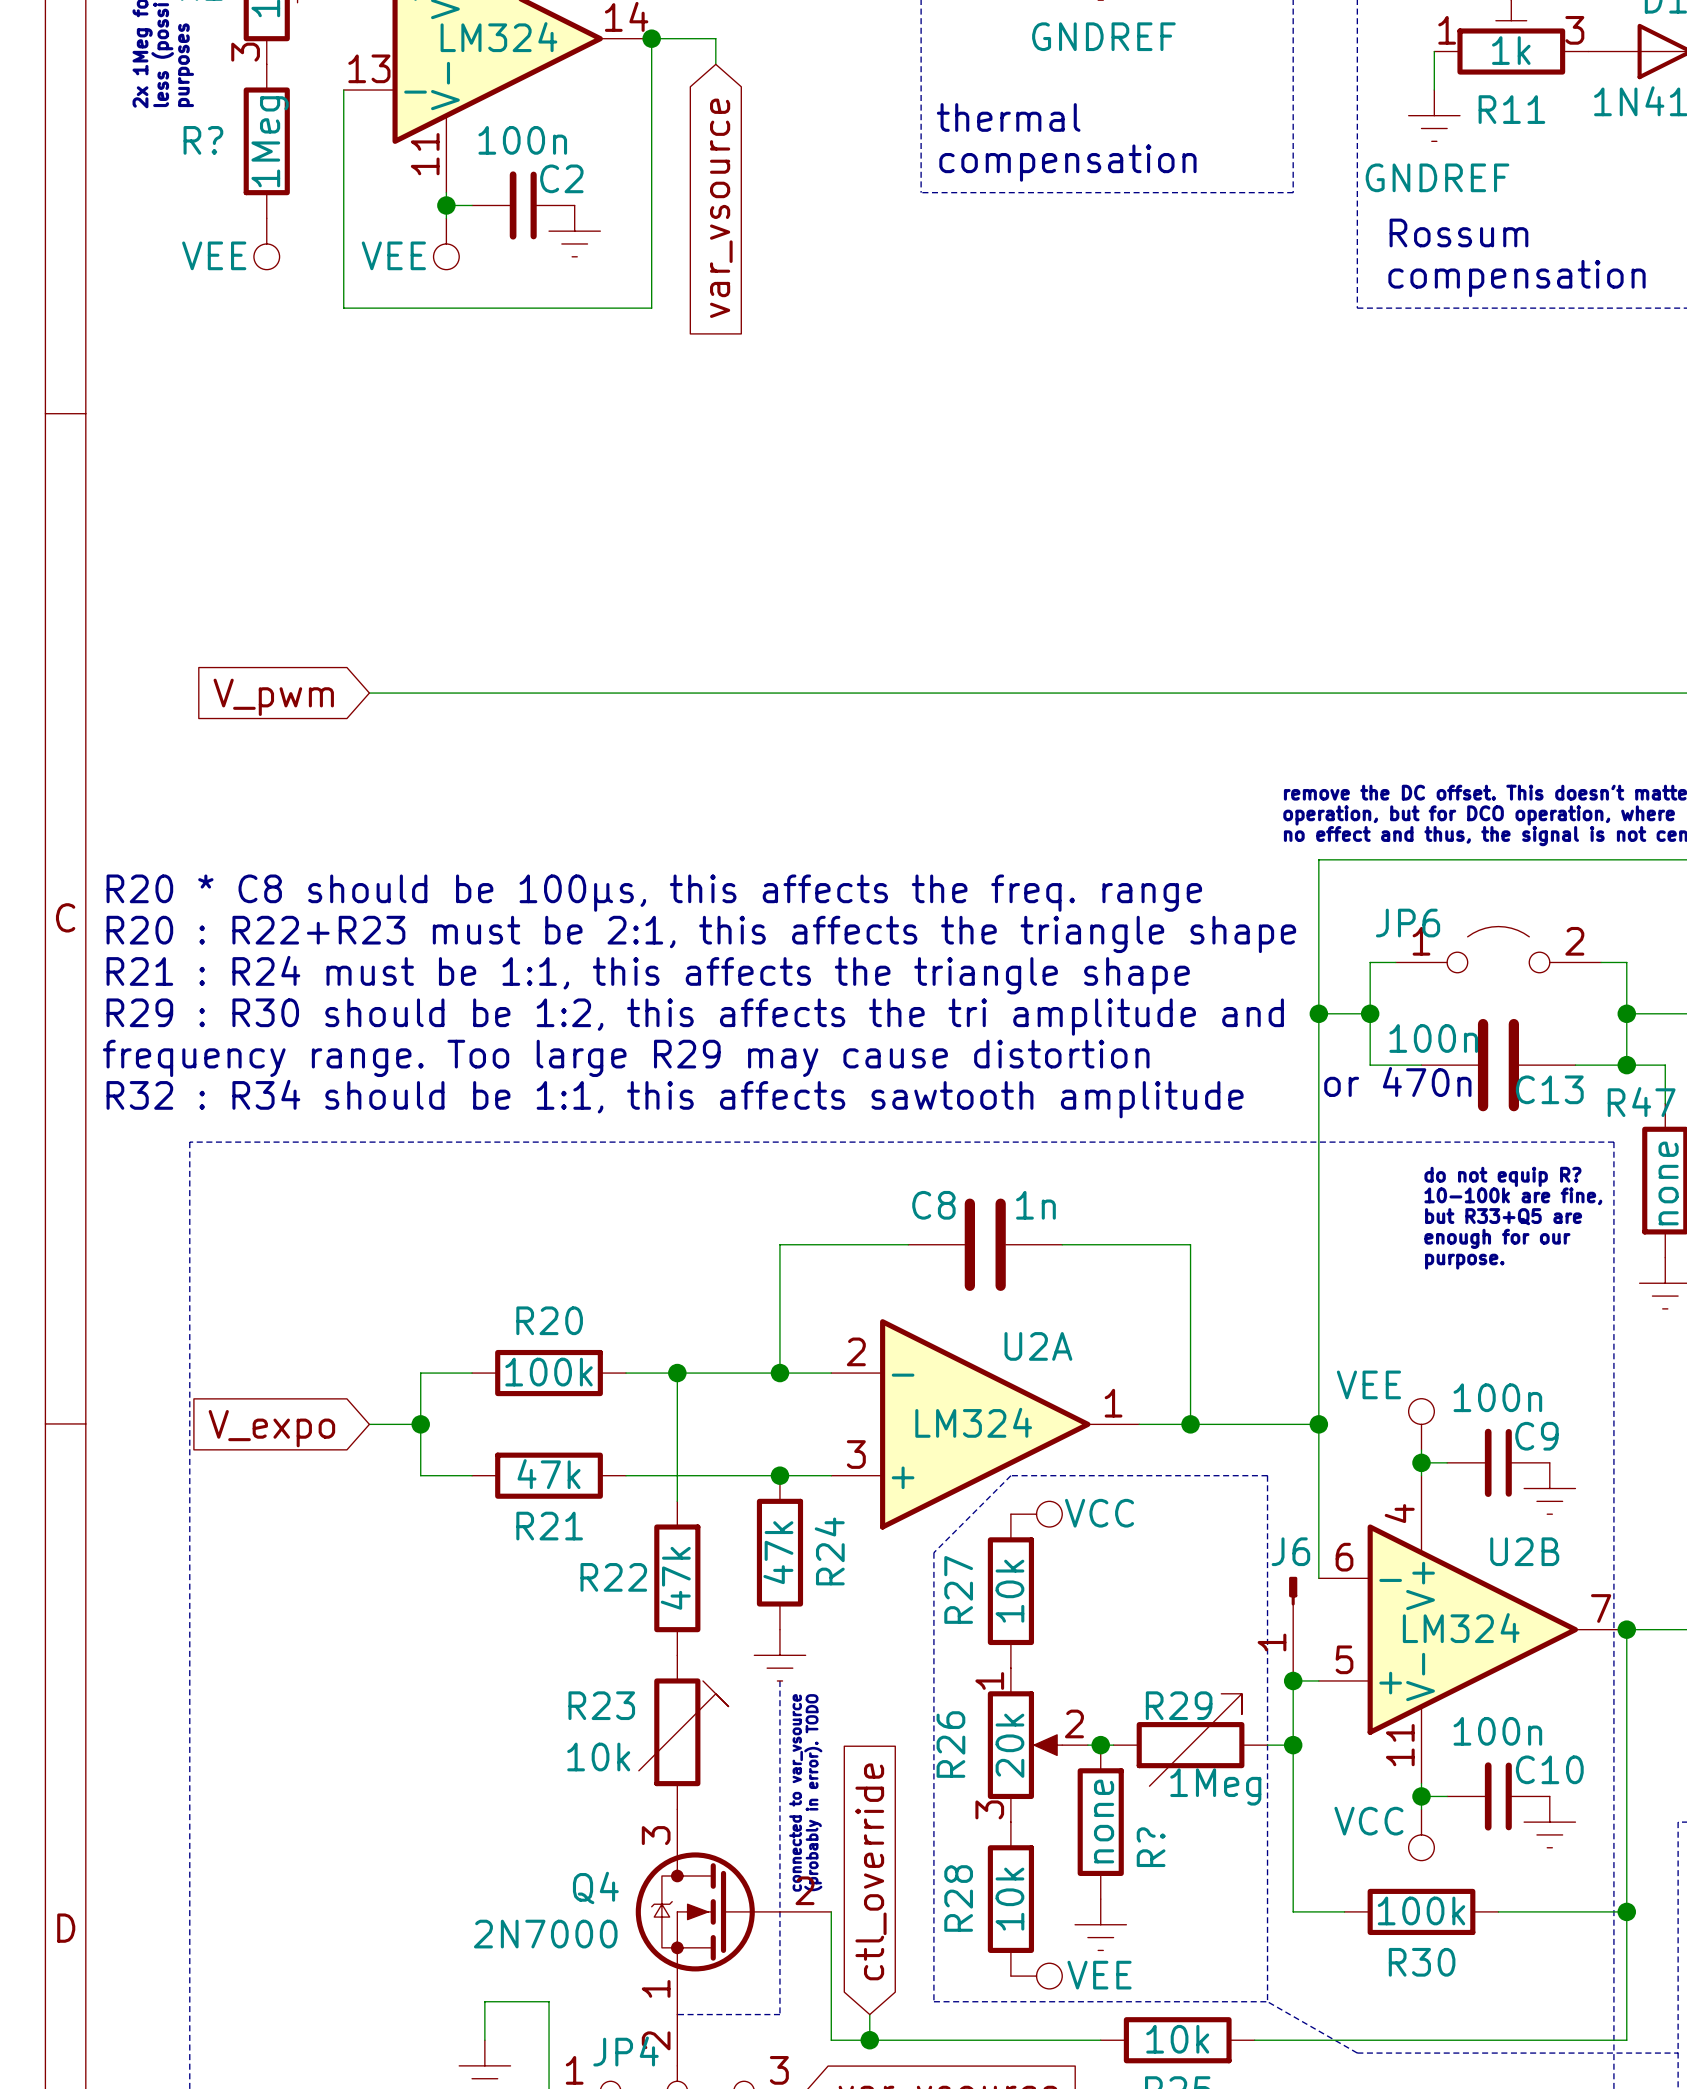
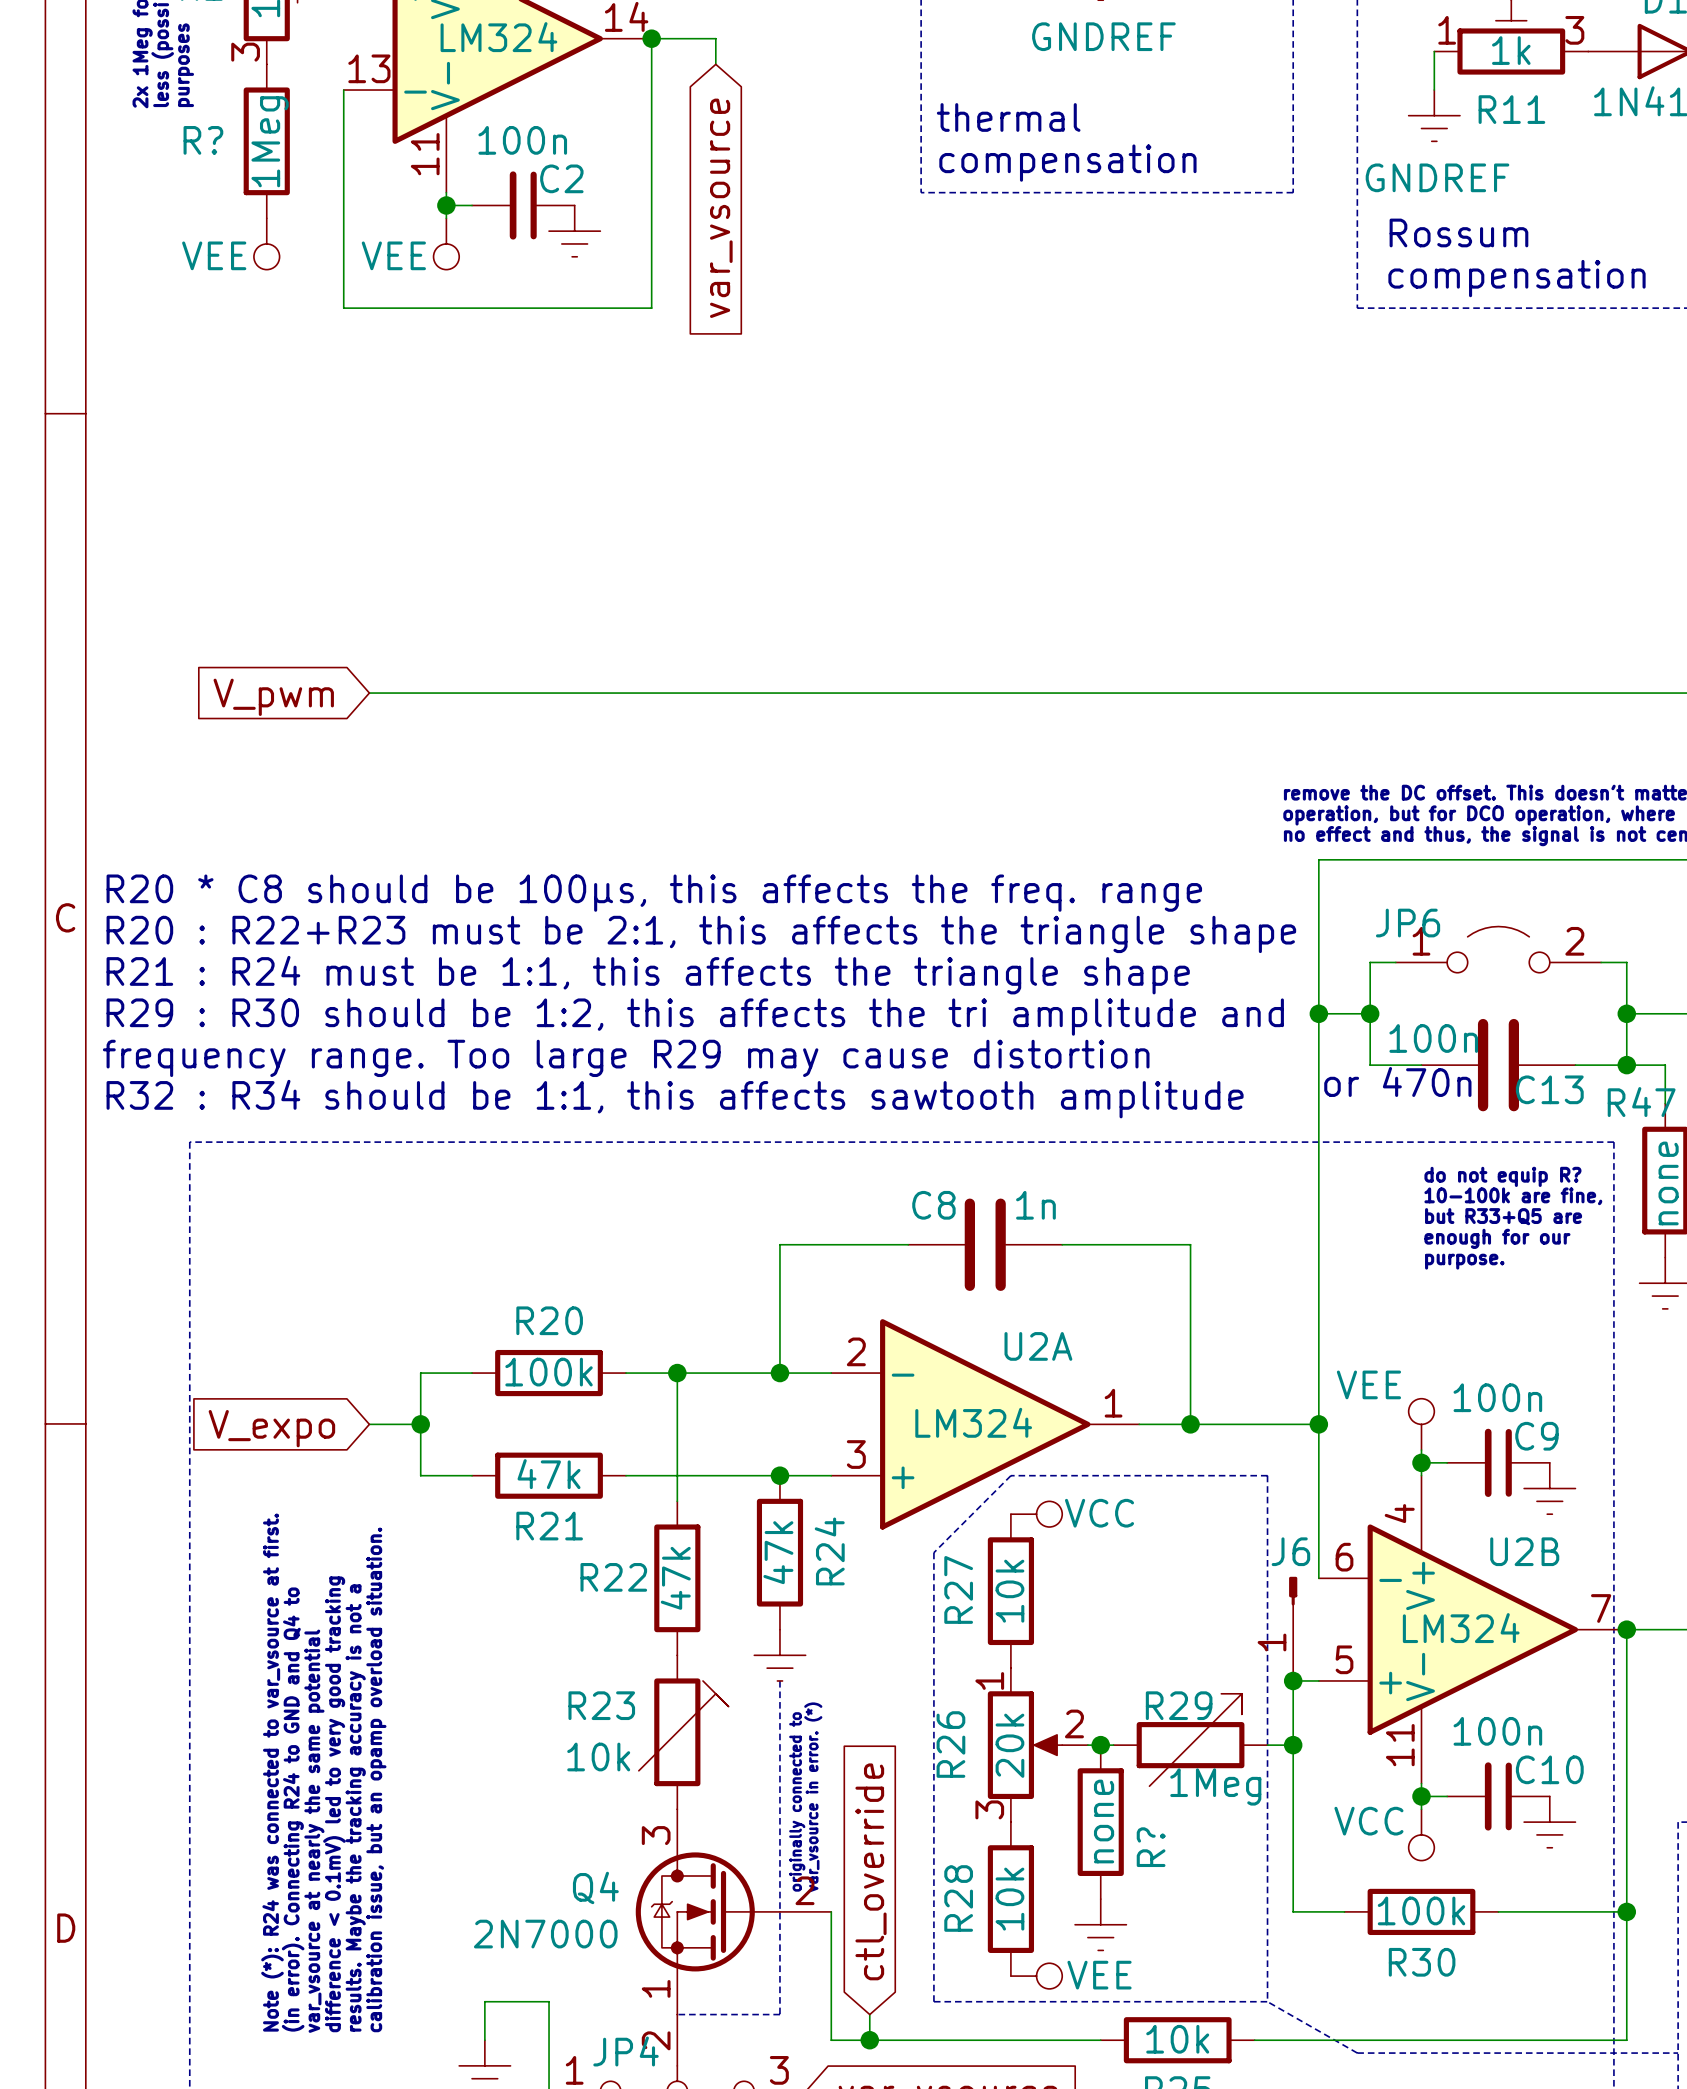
text: none -> Note (*): R24 was connected to var_vsource at first. (272, 1772)
text: none -> calibration issue, but an opamp overload situation. (376, 1779)
text: connected to var_vsource (796, 1792) -> originally connected to (797, 1801)
text: (probably in error). TODO (813, 1792) -> var_vsource in error. (*) (813, 1797)
text: none -> difference < 0.1mV) led to very good tracking (334, 1804)
text: none -> results. Maybe the tracking accuracy is not a (355, 1808)
text: none -> (in error). Connecting R24 to GND and Q4 to (293, 1809)
text: none -> var_vsource at nearly the same potential (314, 1831)

